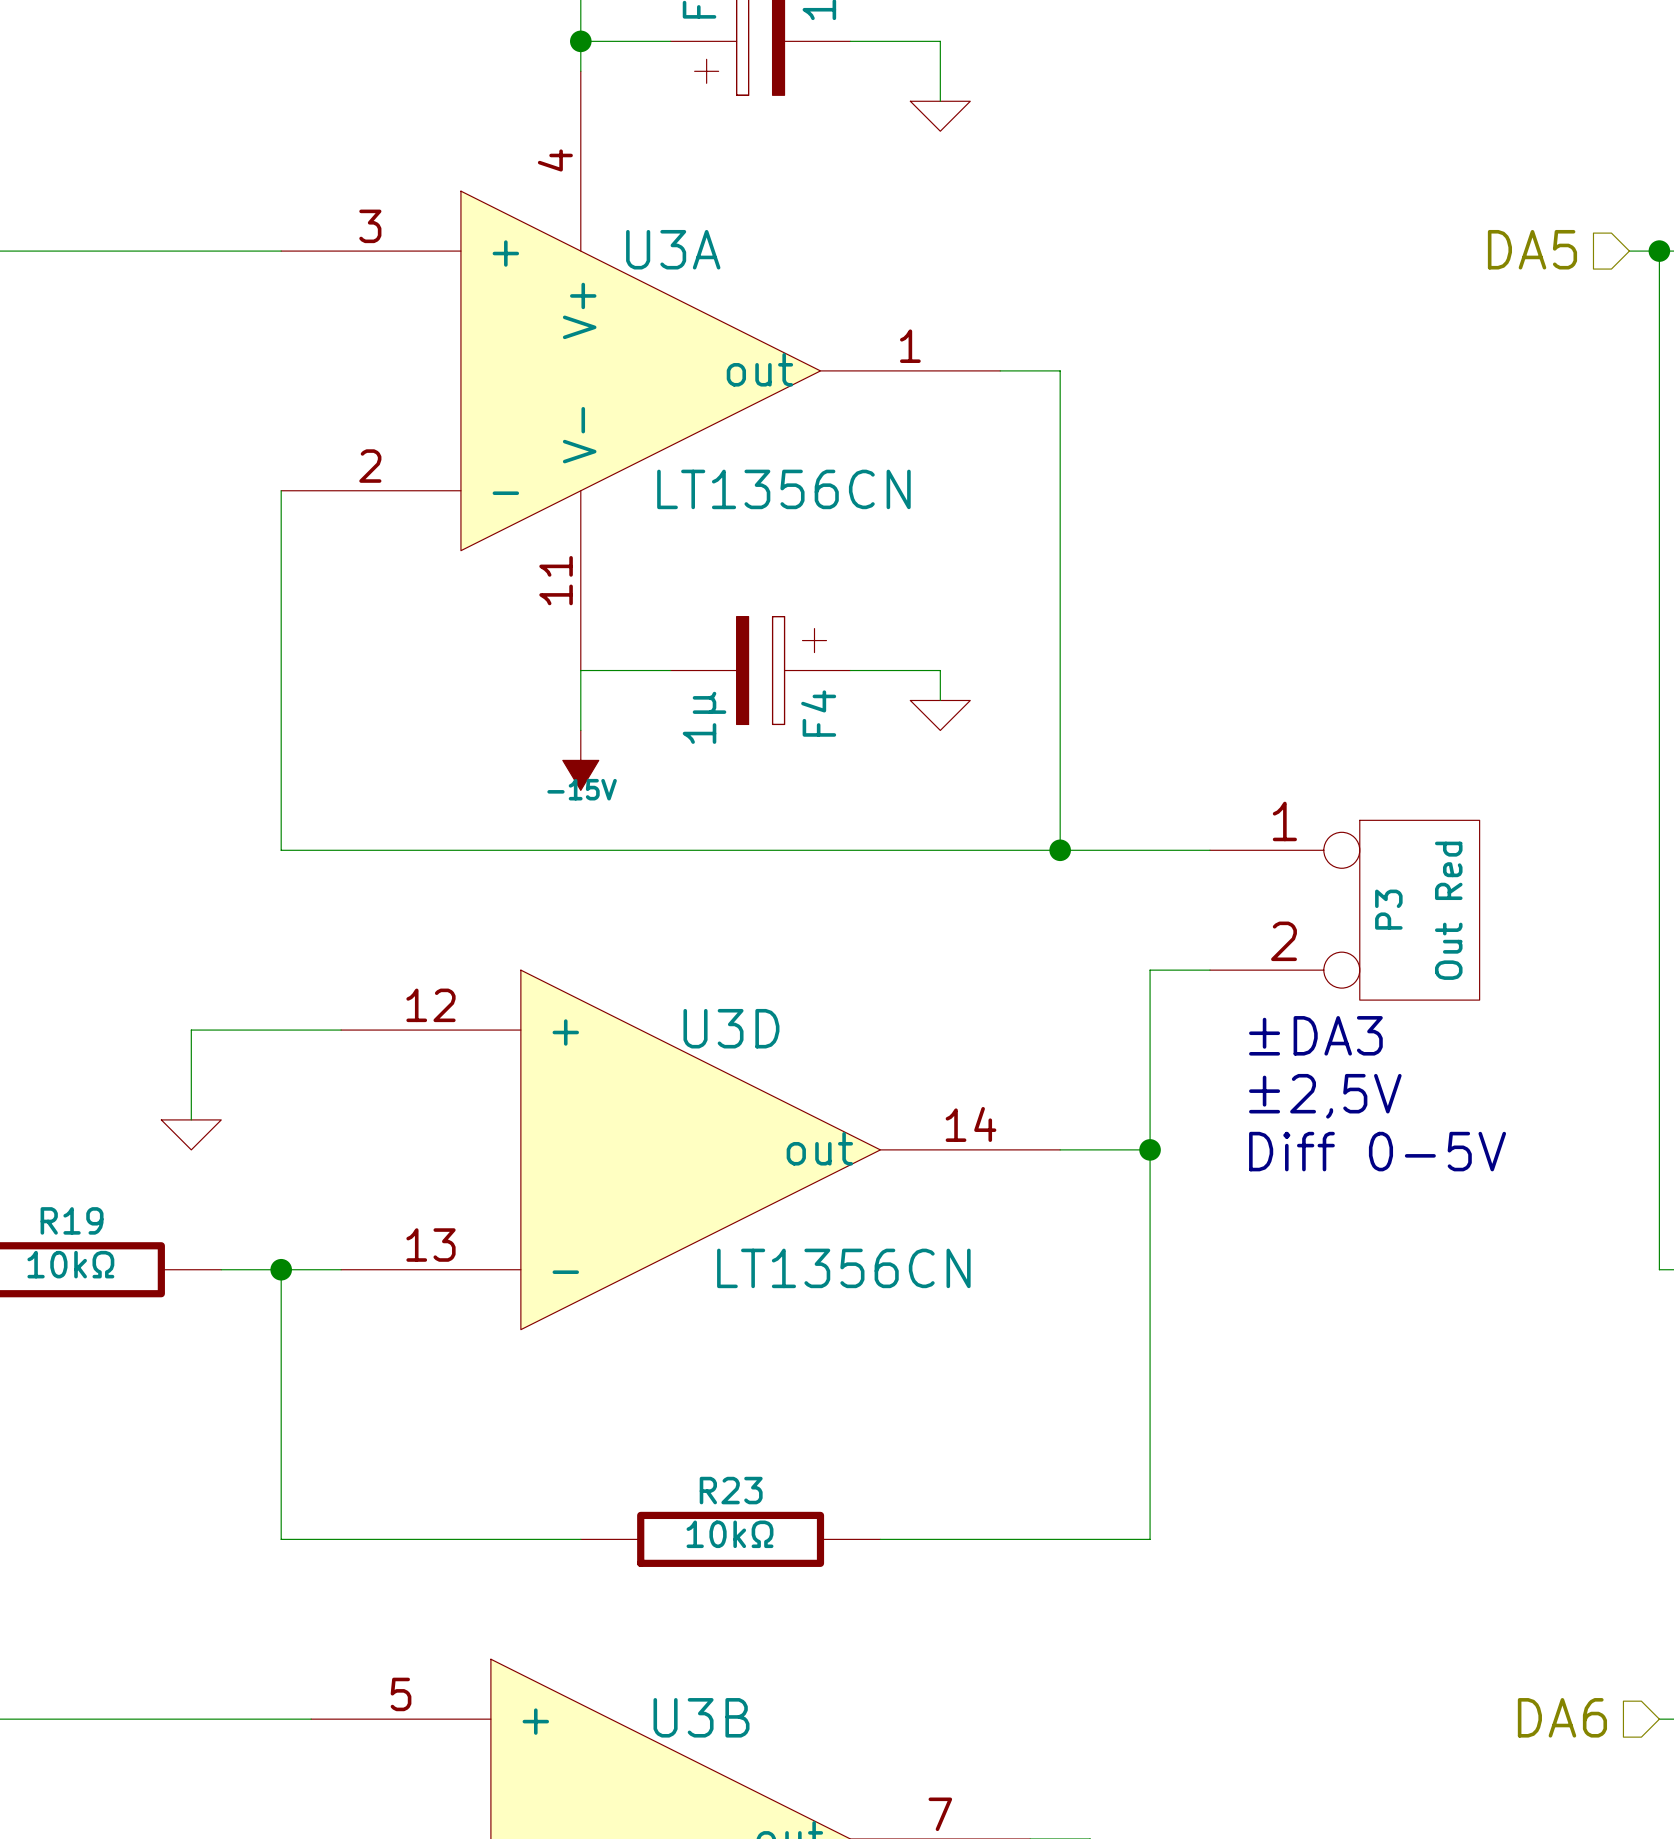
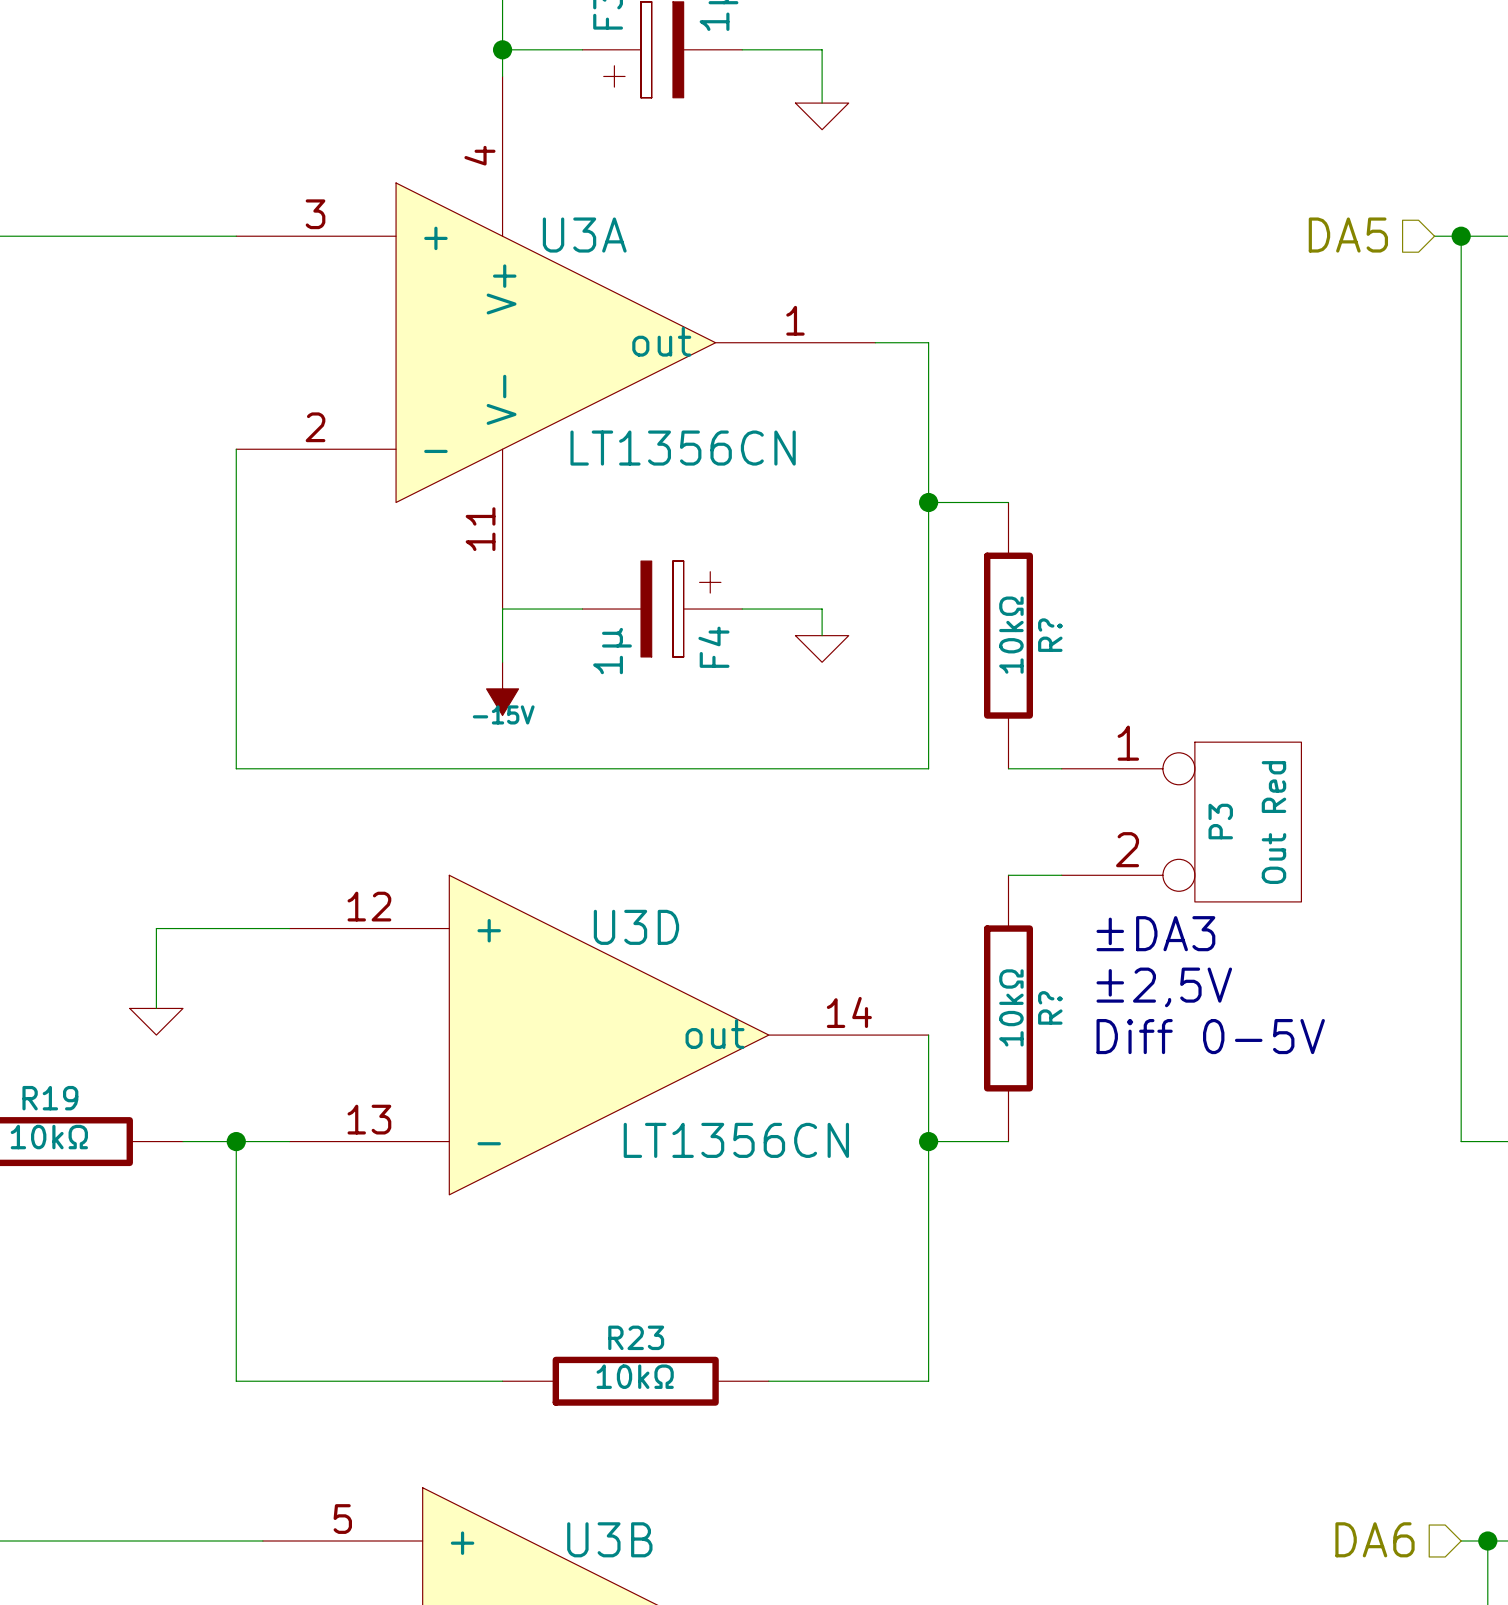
junction: none -> (928, 502)
R?: none -> 10kΩ (1008, 635)
wire: (1060, 850) (1150, 850) -> (928, 502) (1008, 502)
junction: (1060, 850) -> none
wire: (1150, 970) (1150, 1539) (1060, 1539) -> (928, 1035) (928, 1381)
R?: none -> 10kΩ (1008, 1008)
wire: (1060, 1149) (1150, 1149) -> (928, 1141) (1008, 1141)
junction: (1150, 1149) -> none
junction: none -> (928, 1141)

